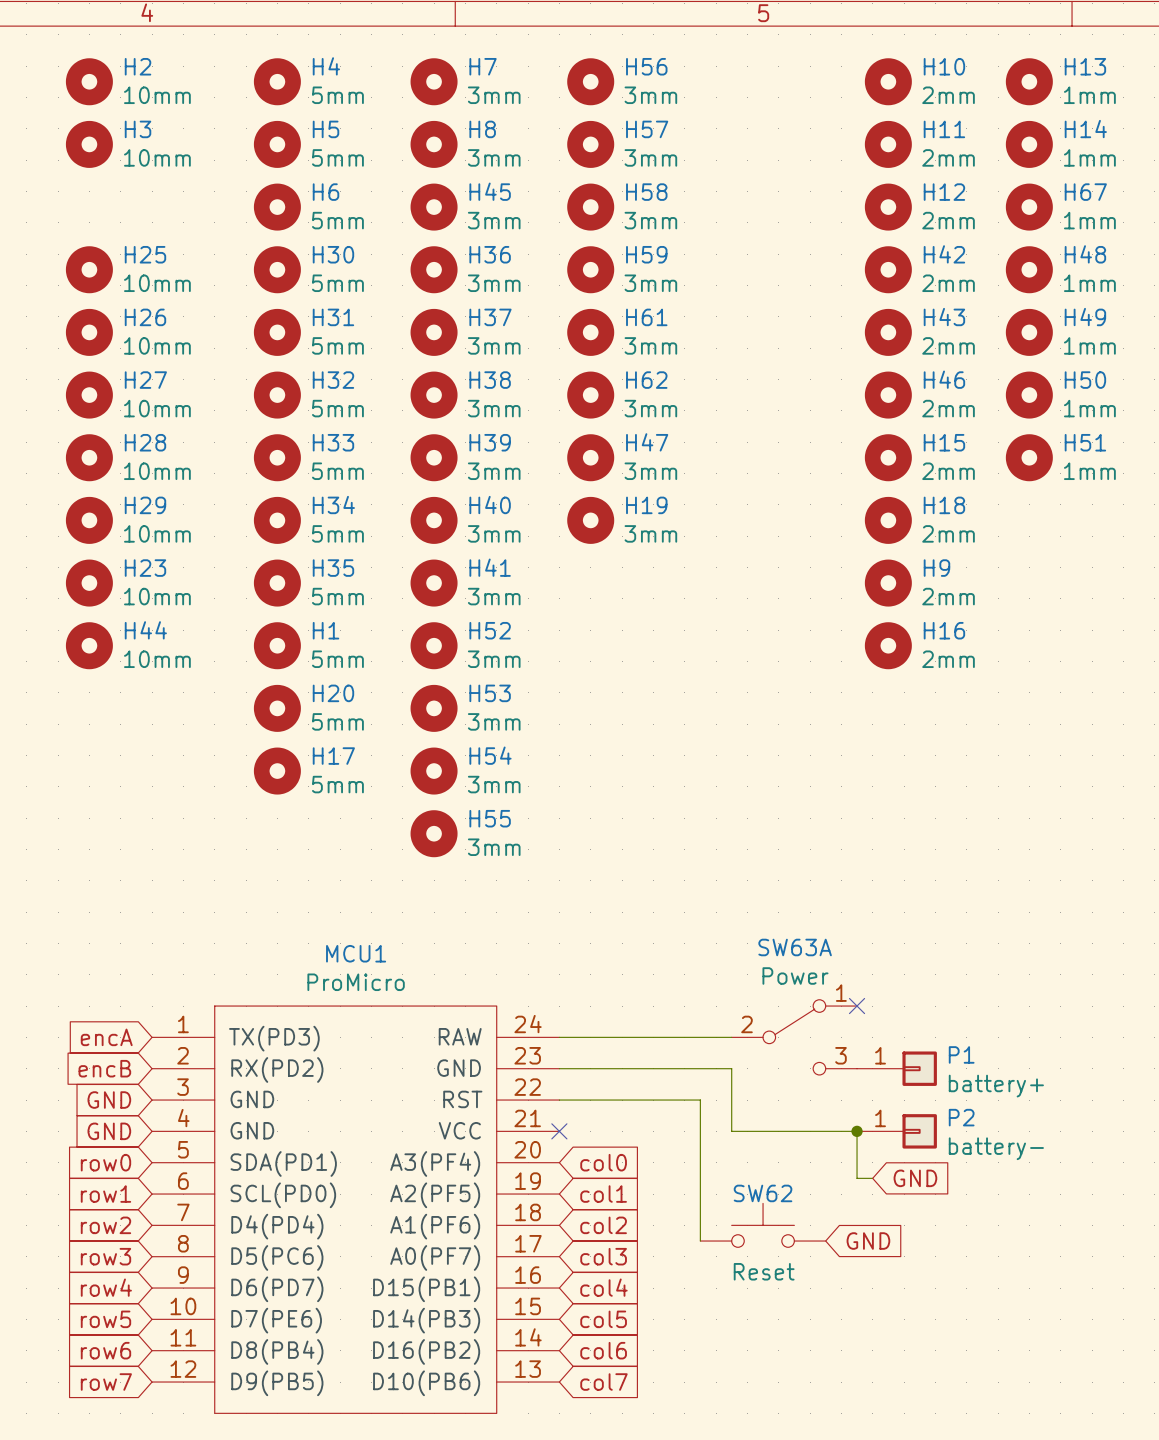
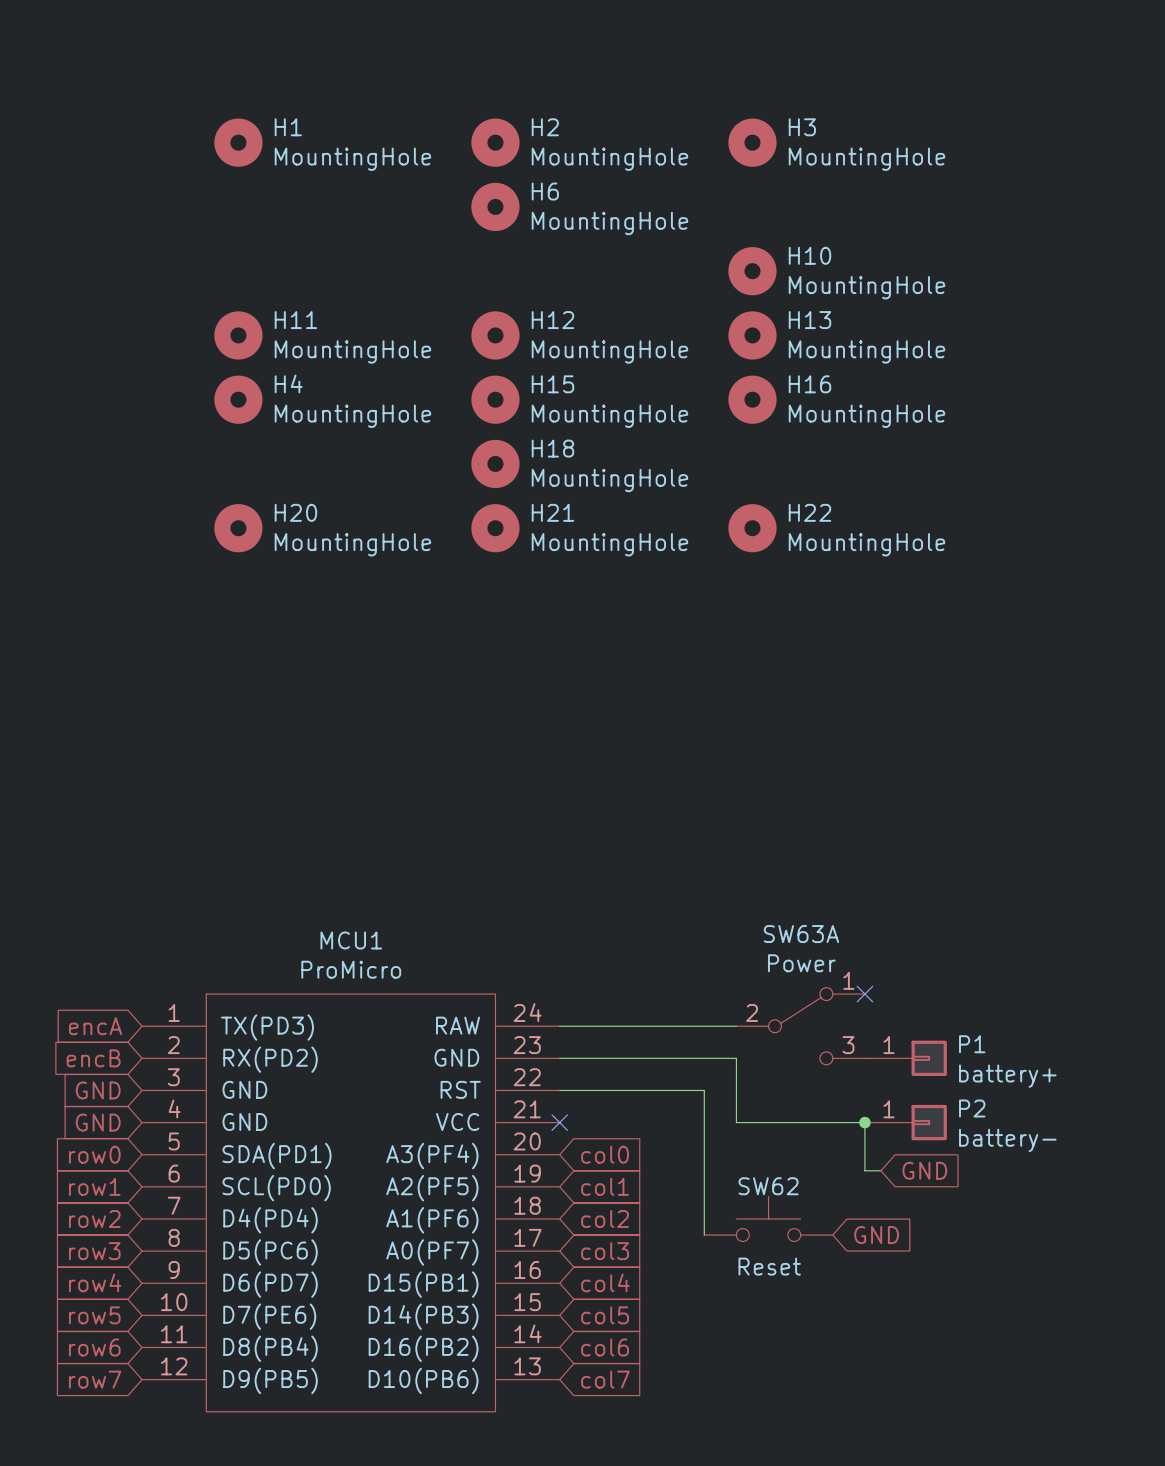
H2 position: (89, 81) -> (495, 142)
H4 position: (277, 81) -> (238, 399)
H7: 3mm (434, 81) -> none
H56: 3mm (590, 81) -> none
H10 position: (888, 81) -> (752, 271)
H13 position: (1029, 81) -> (752, 335)
H2 value: 10mm (157, 95) -> MountingHole (609, 159)
H4 value: 5mm (337, 95) -> MountingHole (352, 416)
H10 value: 2mm (948, 95) -> MountingHole (866, 287)
H13 value: 1mm (1089, 95) -> MountingHole (866, 351)
H3 position: (89, 144) -> (752, 142)
H5: 5mm (277, 144) -> none
H8: 3mm (434, 144) -> none
H57: 3mm (590, 144) -> none
H11 position: (888, 144) -> (238, 335)
H14: 1mm (1029, 144) -> none
H3 value: 10mm (157, 157) -> MountingHole (866, 159)
H11 value: 2mm (948, 157) -> MountingHole (352, 351)
H6 position: (277, 207) -> (495, 206)
H45: 3mm (434, 207) -> none
H58: 3mm (590, 207) -> none
H12 position: (888, 207) -> (495, 335)
H67: 1mm (1029, 207) -> none
H6 value: 5mm (337, 220) -> MountingHole (609, 223)
H12 value: 2mm (948, 220) -> MountingHole (609, 351)
H25: 10mm (89, 269) -> none
H30: 5mm (277, 269) -> none
H36: 3mm (434, 269) -> none
H59: 3mm (590, 269) -> none
H42: 2mm (888, 269) -> none
H48: 1mm (1029, 269) -> none
H26: 10mm (89, 332) -> none
H31: 5mm (277, 332) -> none
H37: 3mm (434, 332) -> none
H61: 3mm (590, 332) -> none
H43: 2mm (888, 332) -> none
H49: 1mm (1029, 332) -> none
H27: 10mm (89, 395) -> none
H32: 5mm (277, 395) -> none
H38: 3mm (434, 395) -> none
H62: 3mm (590, 395) -> none
H46: 2mm (888, 395) -> none
H50: 1mm (1029, 395) -> none
H28: 10mm (89, 457) -> none
H33: 5mm (277, 457) -> none
H39: 3mm (434, 457) -> none
H47: 3mm (590, 457) -> none
H15 position: (888, 457) -> (495, 399)
H51: 1mm (1029, 457) -> none
H15 value: 2mm (948, 471) -> MountingHole (609, 416)
H29: 10mm (89, 520) -> none
H34: 5mm (277, 520) -> none
H40: 3mm (434, 520) -> none
H19: 3mm (590, 520) -> none
H18 position: (888, 520) -> (495, 463)
H18 value: 2mm (948, 533) -> MountingHole (609, 480)
H21: none -> MountingHole (495, 528)
H22: none -> MountingHole (752, 528)
H23: 10mm (89, 583) -> none
H35: 5mm (277, 583) -> none
H41: 3mm (434, 583) -> none
H9: 2mm (888, 583) -> none
H44: 10mm (89, 645) -> none
H1 position: (277, 645) -> (238, 142)
H52: 3mm (434, 645) -> none
H16 position: (888, 645) -> (752, 399)
H1 value: 5mm (337, 659) -> MountingHole (352, 159)
H16 value: 2mm (948, 659) -> MountingHole (866, 416)
H20 position: (277, 708) -> (238, 528)
H53: 3mm (434, 708) -> none
H20 value: 5mm (337, 721) -> MountingHole (352, 544)
H17: 5mm (277, 771) -> none
H54: 3mm (434, 771) -> none
H55: 3mm (434, 833) -> none

